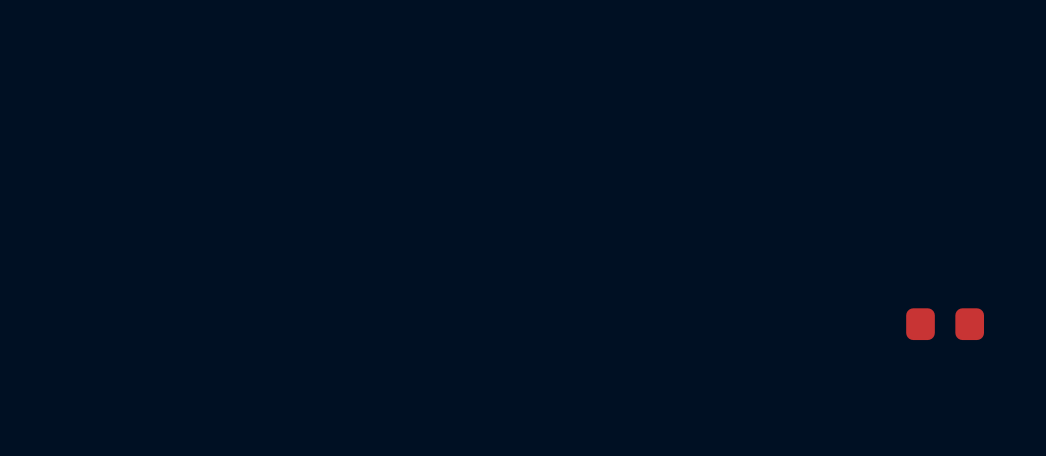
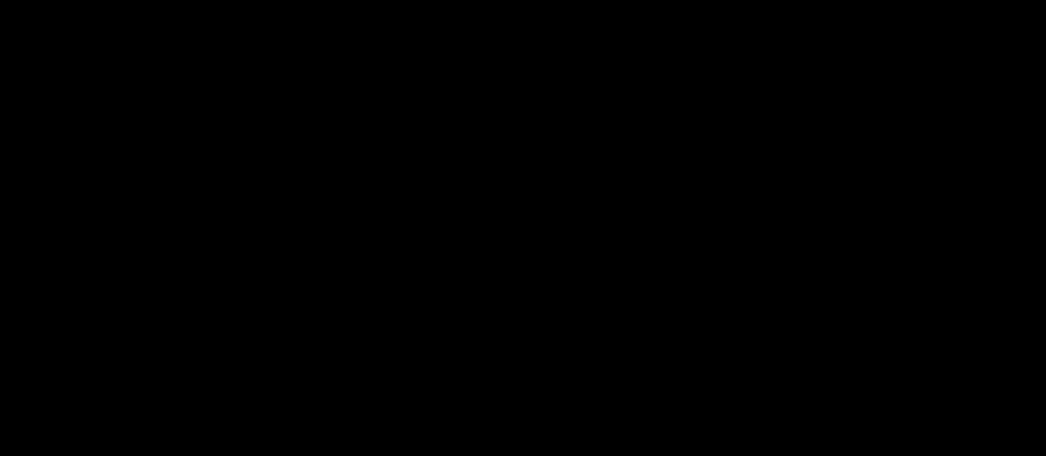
part: (945, 324) -> none

